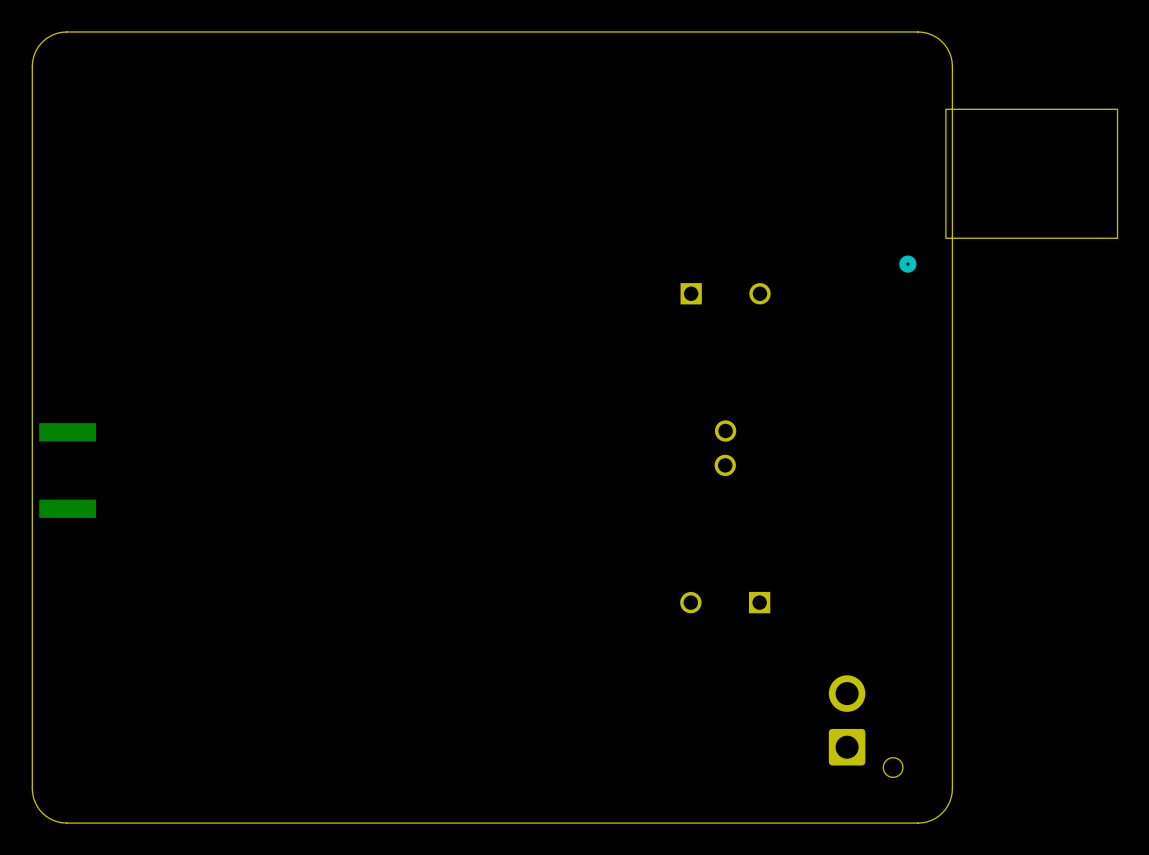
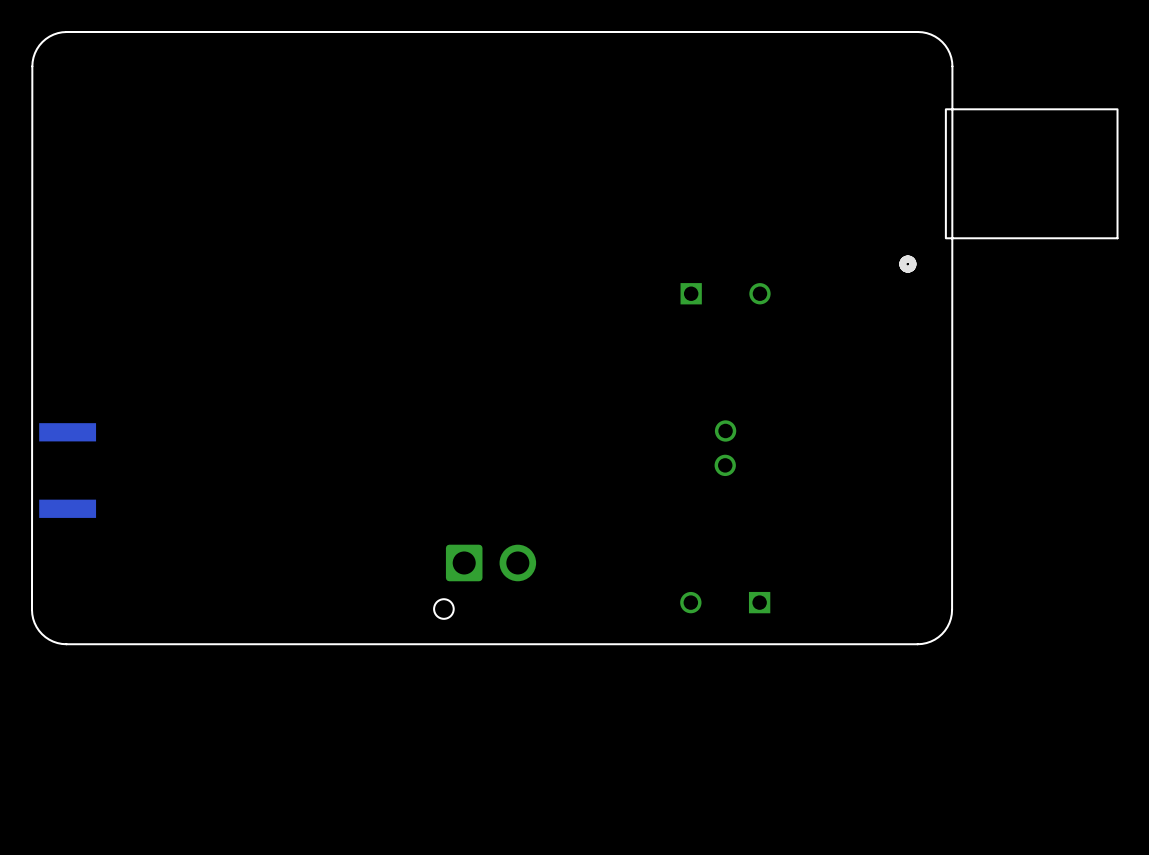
board edge: (952, 66) (952, 788) (949, 801) (942, 813) (931, 820) (918, 823) (66, 823) (57, 821) (45, 815) (36, 805) (32, 788) (32, 66) -> (952, 66) (952, 609) (949, 622) (942, 634) (930, 641) (917, 644) (66, 644) (49, 639) (36, 627) (31, 609) (32, 66)
part: none -> (907, 264)
part: none -> (485, 581)
part: (865, 726) -> none

